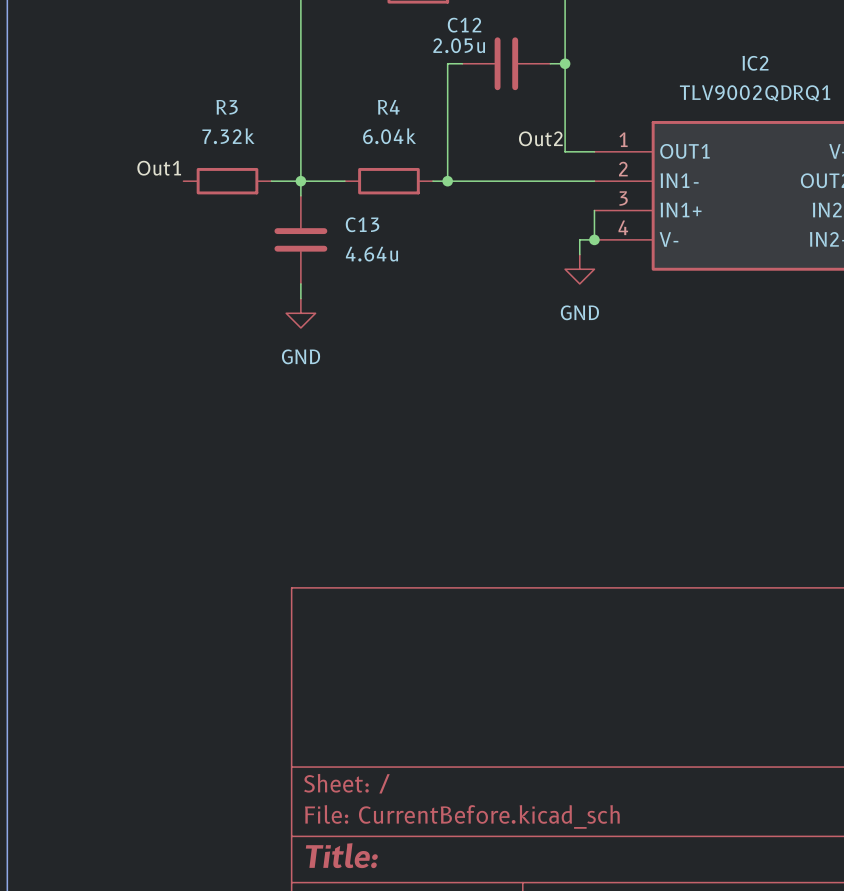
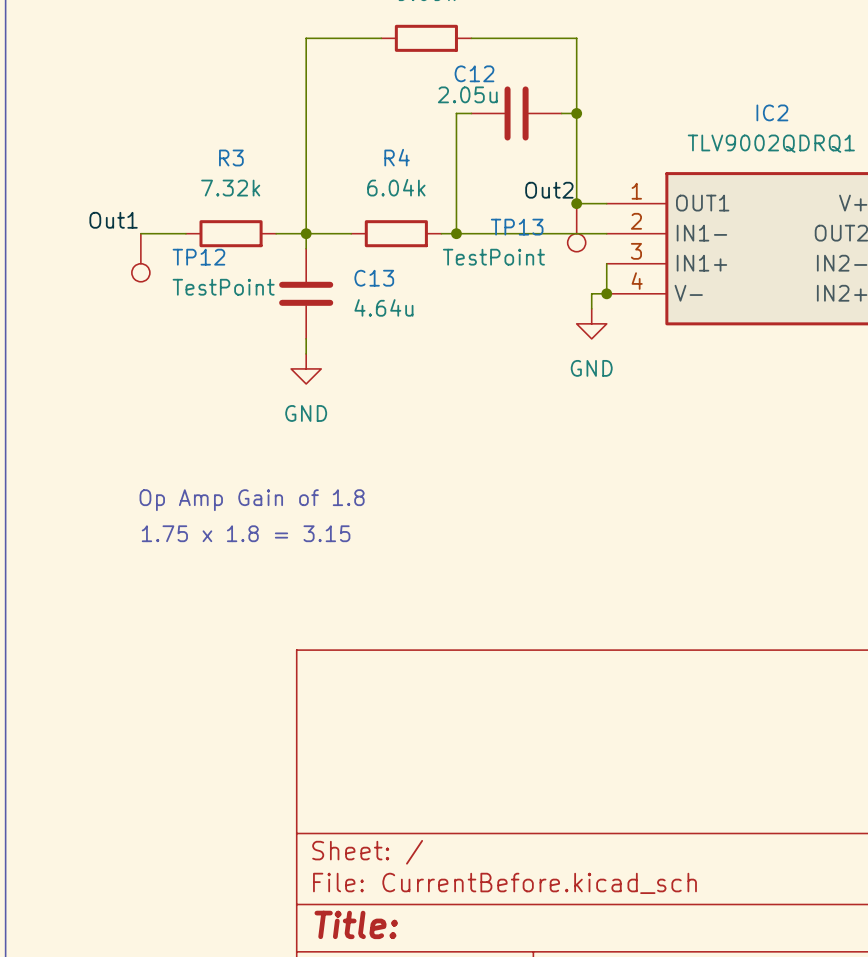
junction: none -> (576, 203)
label position: Out1 (159, 168) -> Out1 (113, 220)
TP13: none -> TestPoint (576, 227)
wire: none -> (140, 233) (185, 233)
TP12: none -> TestPoint (140, 257)
text: none -> Op Amp Gain of 1.8 (252, 500)
text: none -> 1.75 x 1.8 = 3.15 (246, 533)

